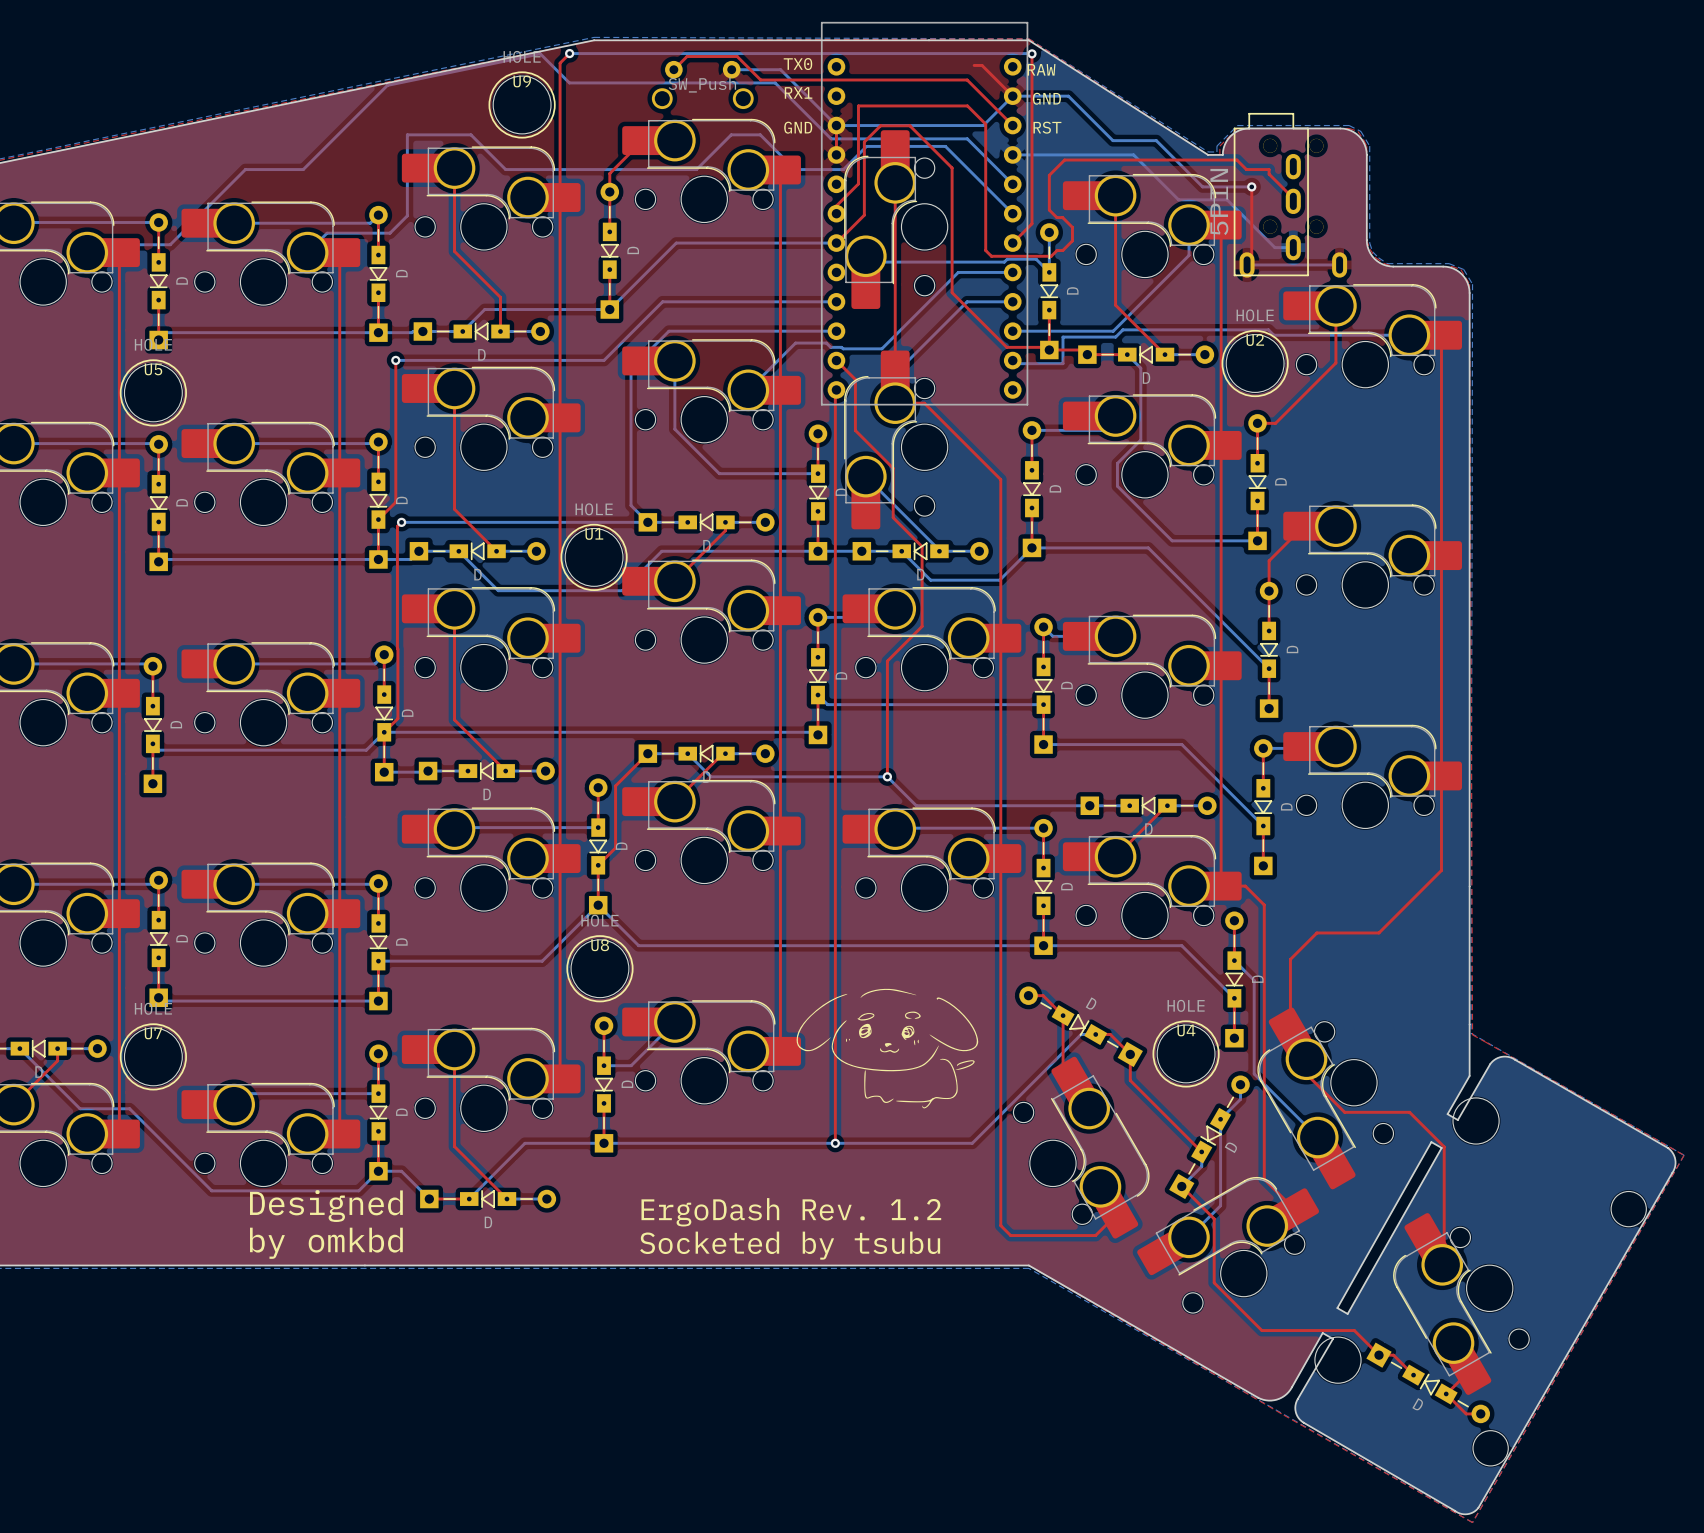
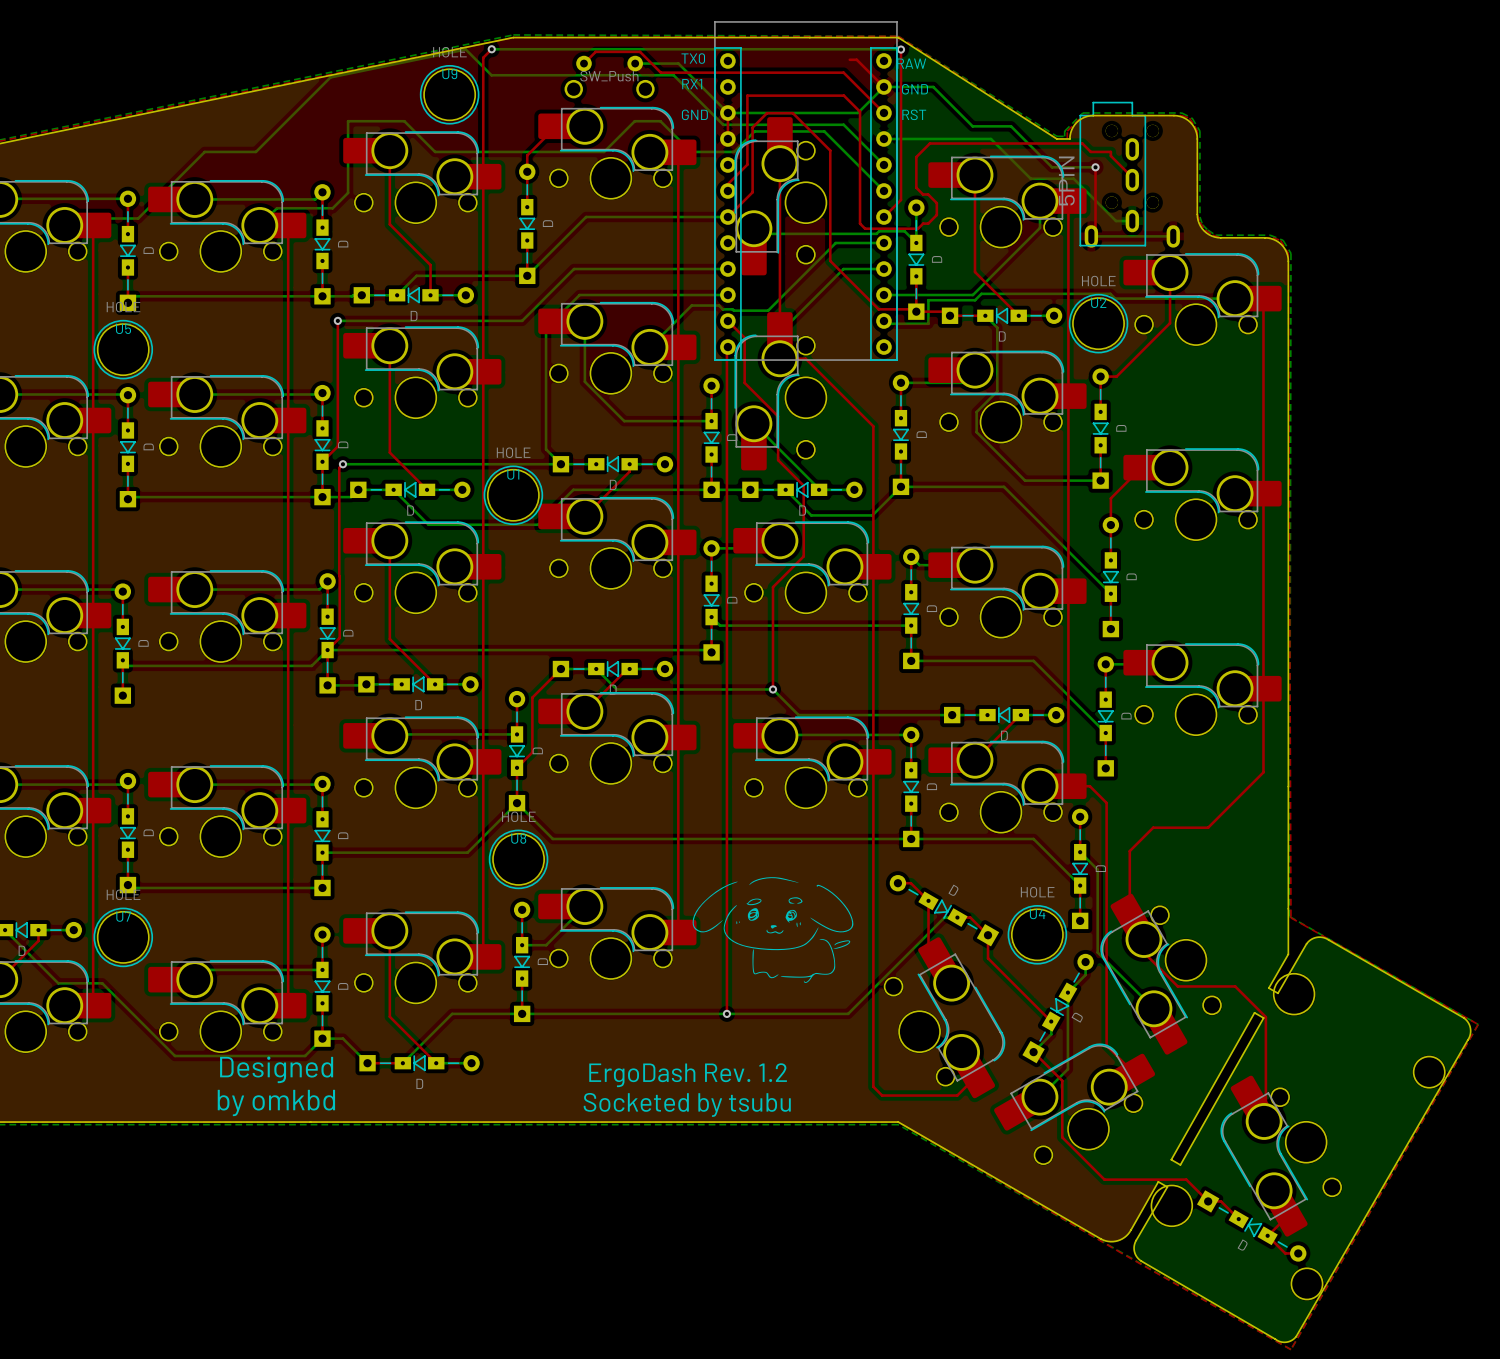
part footprint: [820, 21, 1029, 406] -> [714, 21, 898, 361]

